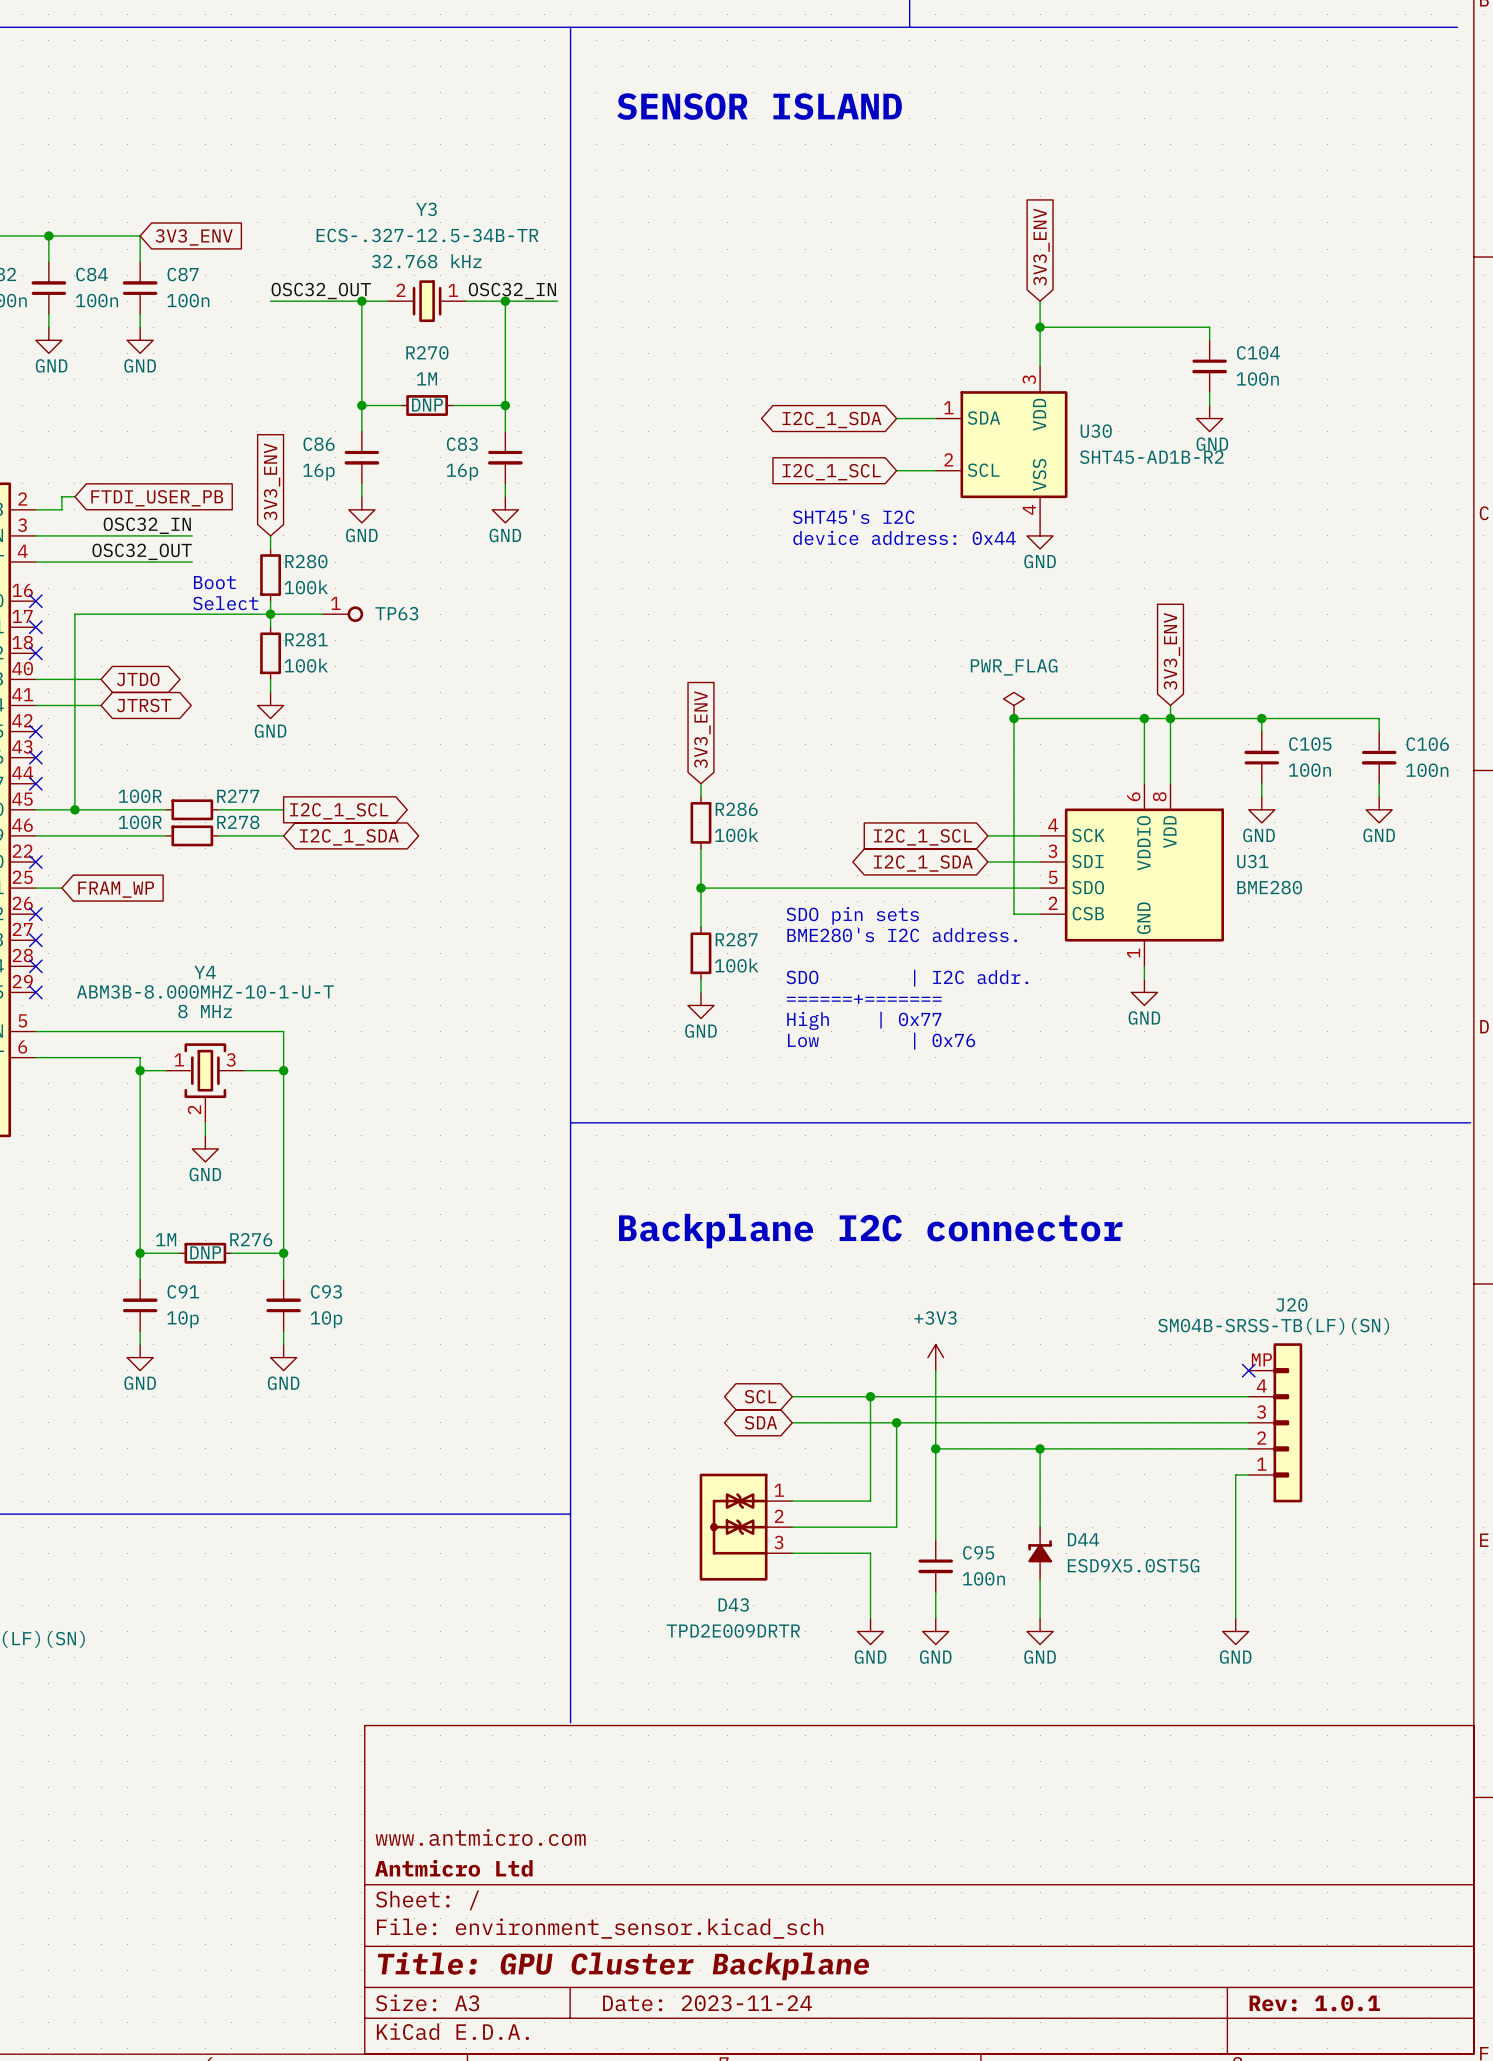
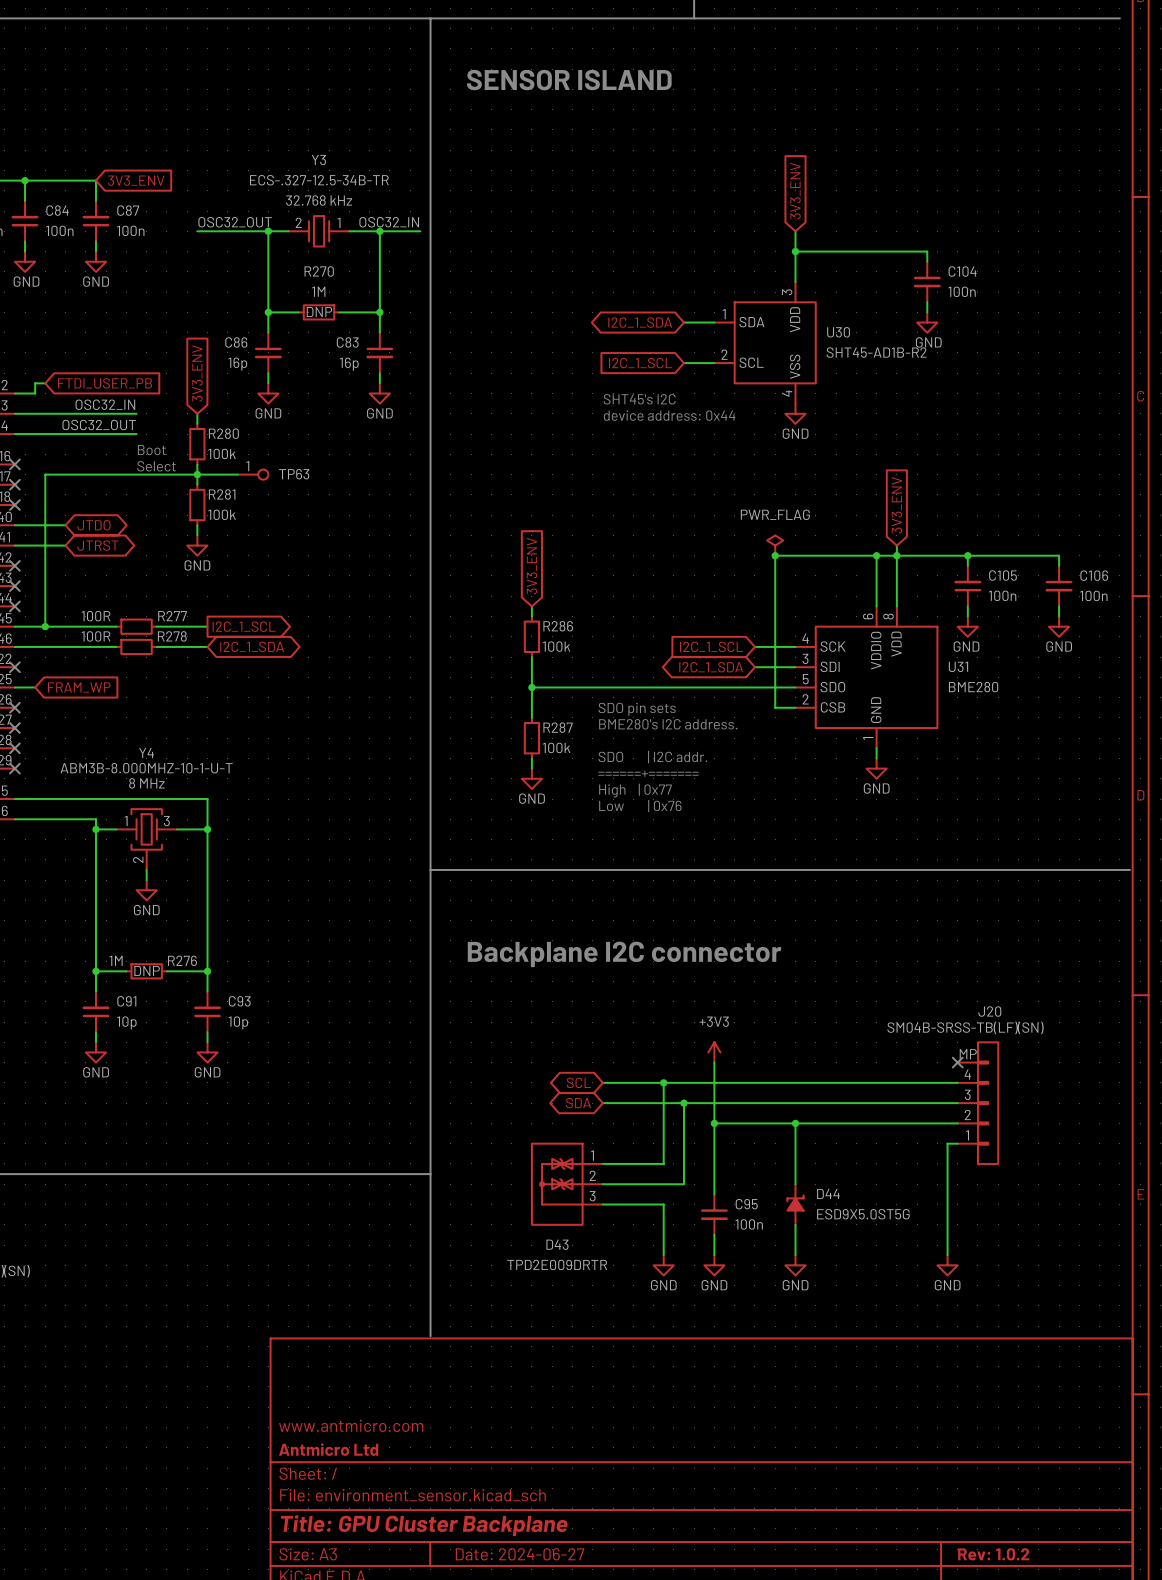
title block: Date: 2023-11-24 (707, 2003) -> Date: 2024-06-27 (520, 1554)
title block: Rev: 1.0.1 (1314, 2003) -> Rev: 1.0.2 (993, 1554)

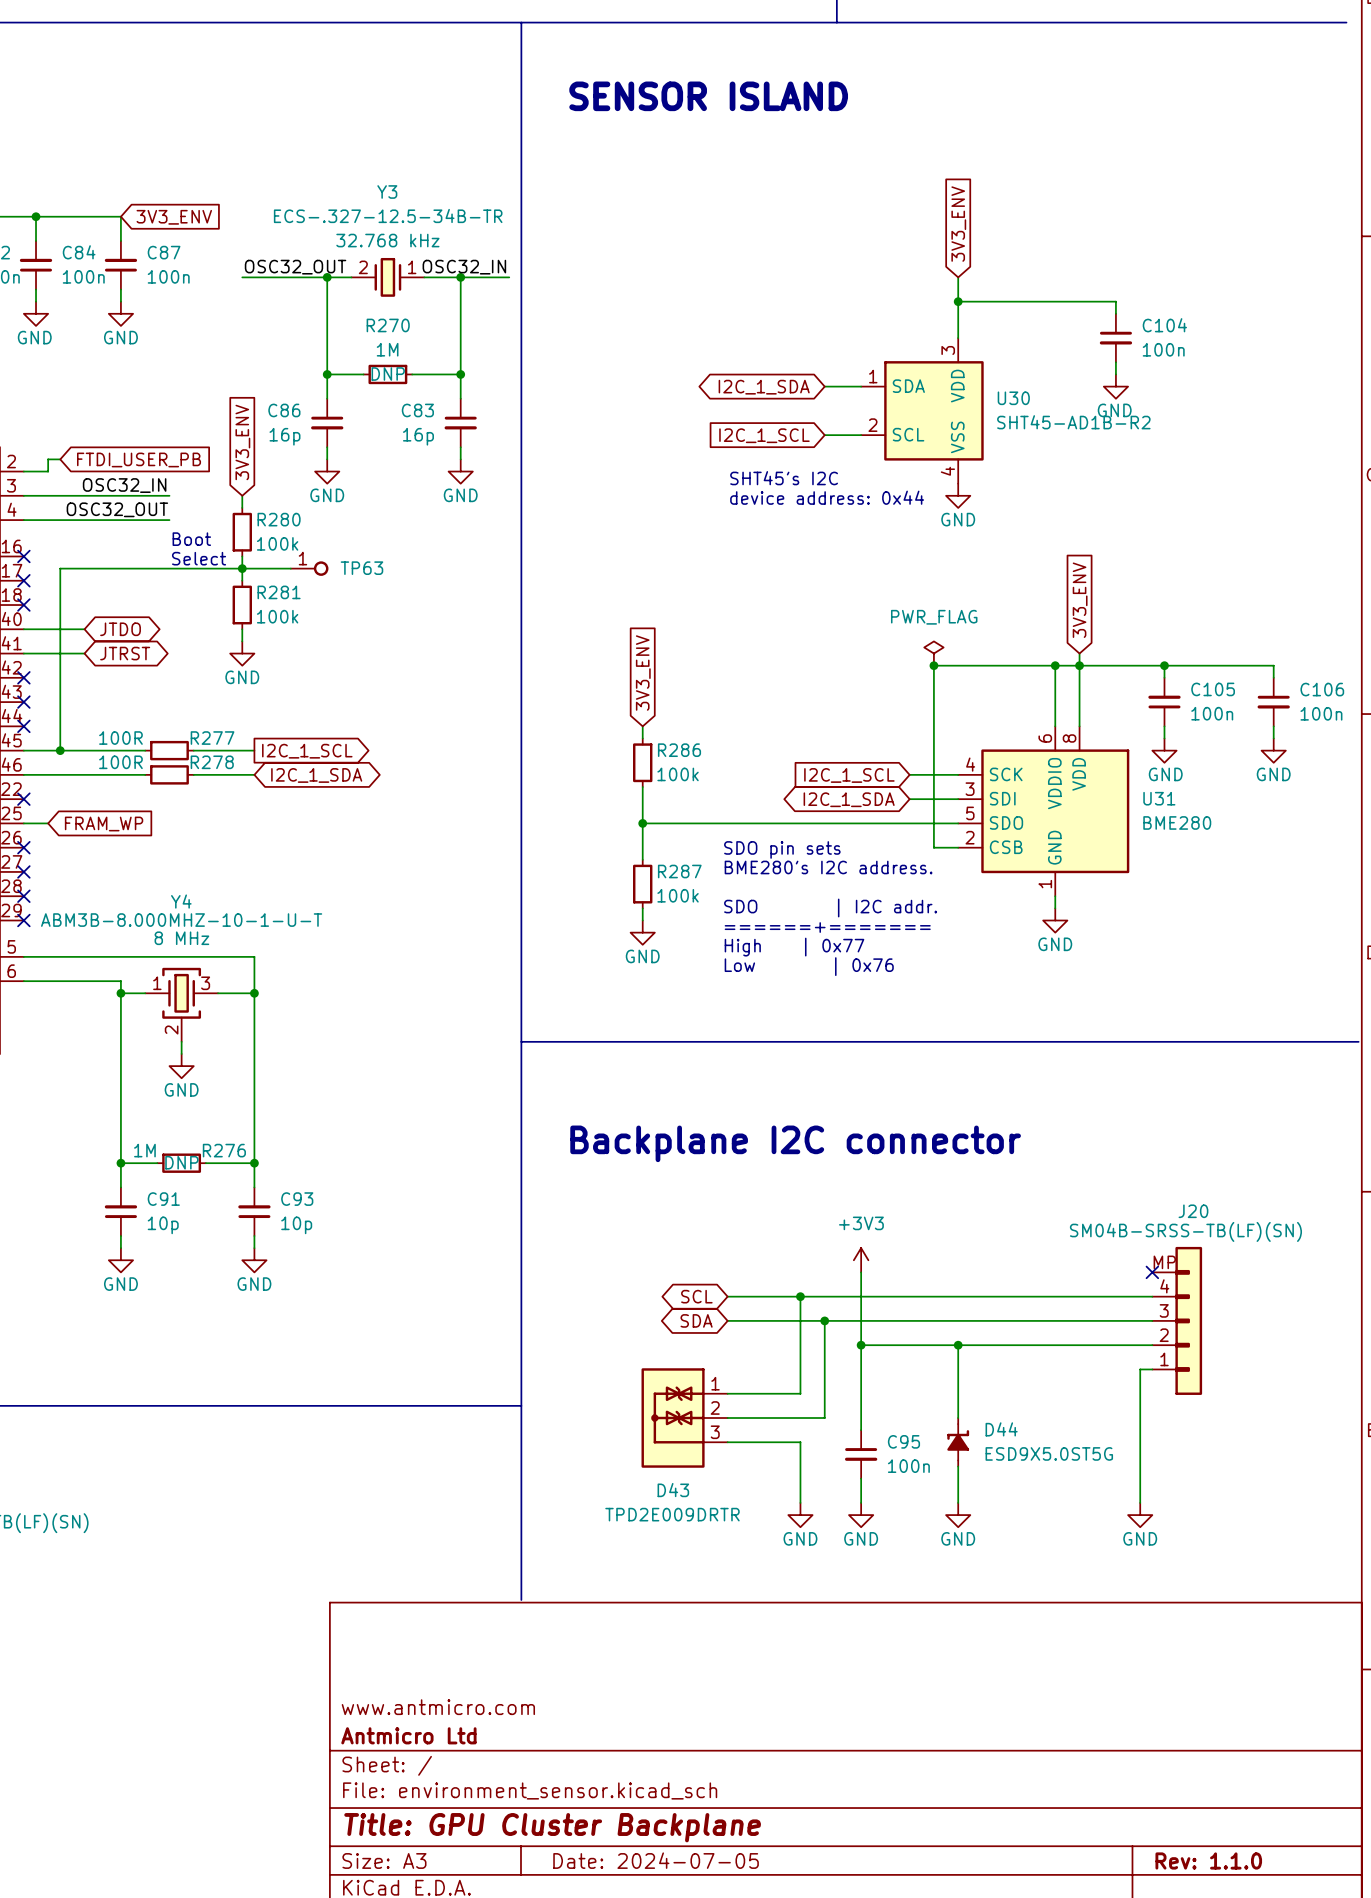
title block: Date: 2024-06-27 (520, 1554) -> Date: 2024-07-05 (656, 1860)
title block: Rev: 1.0.2 (993, 1554) -> Rev: 1.1.0 (1208, 1860)

